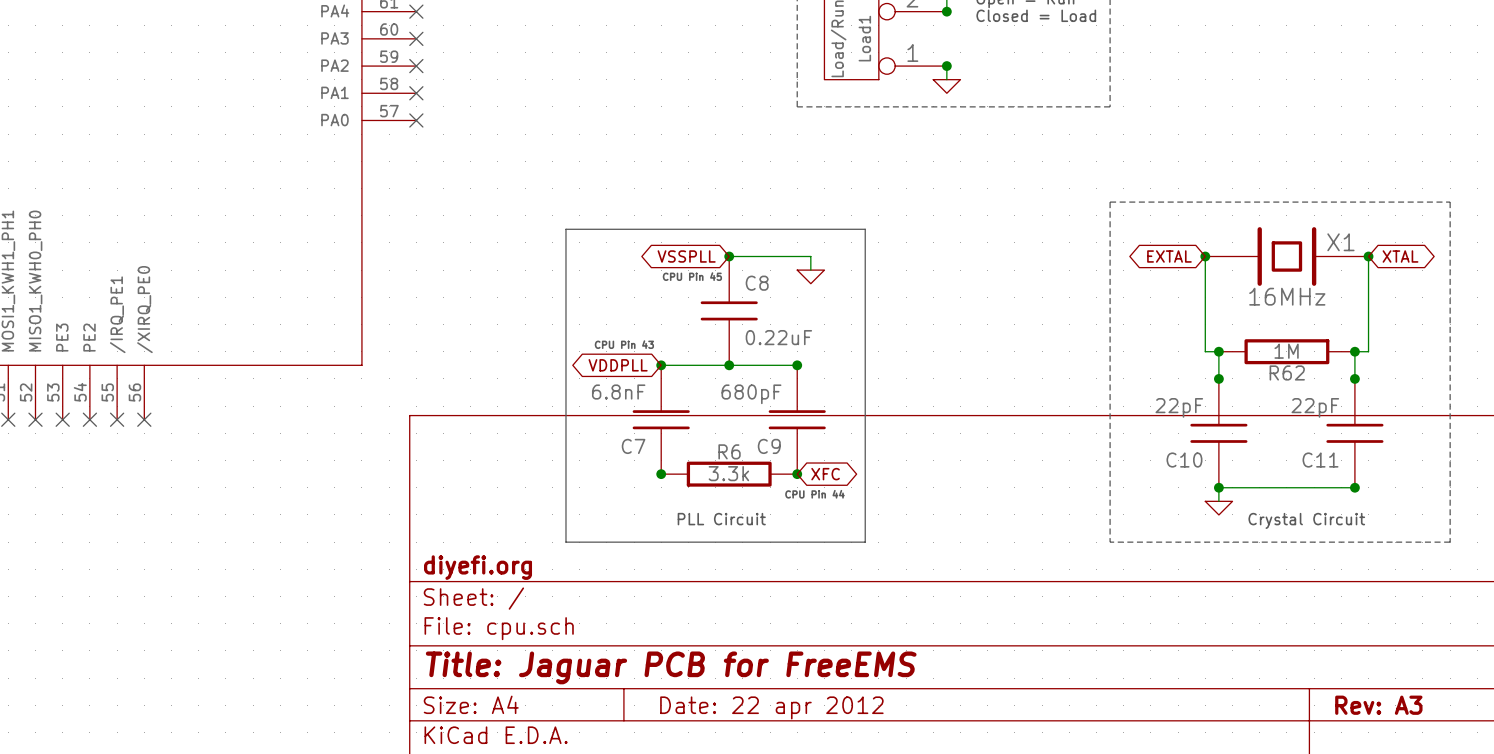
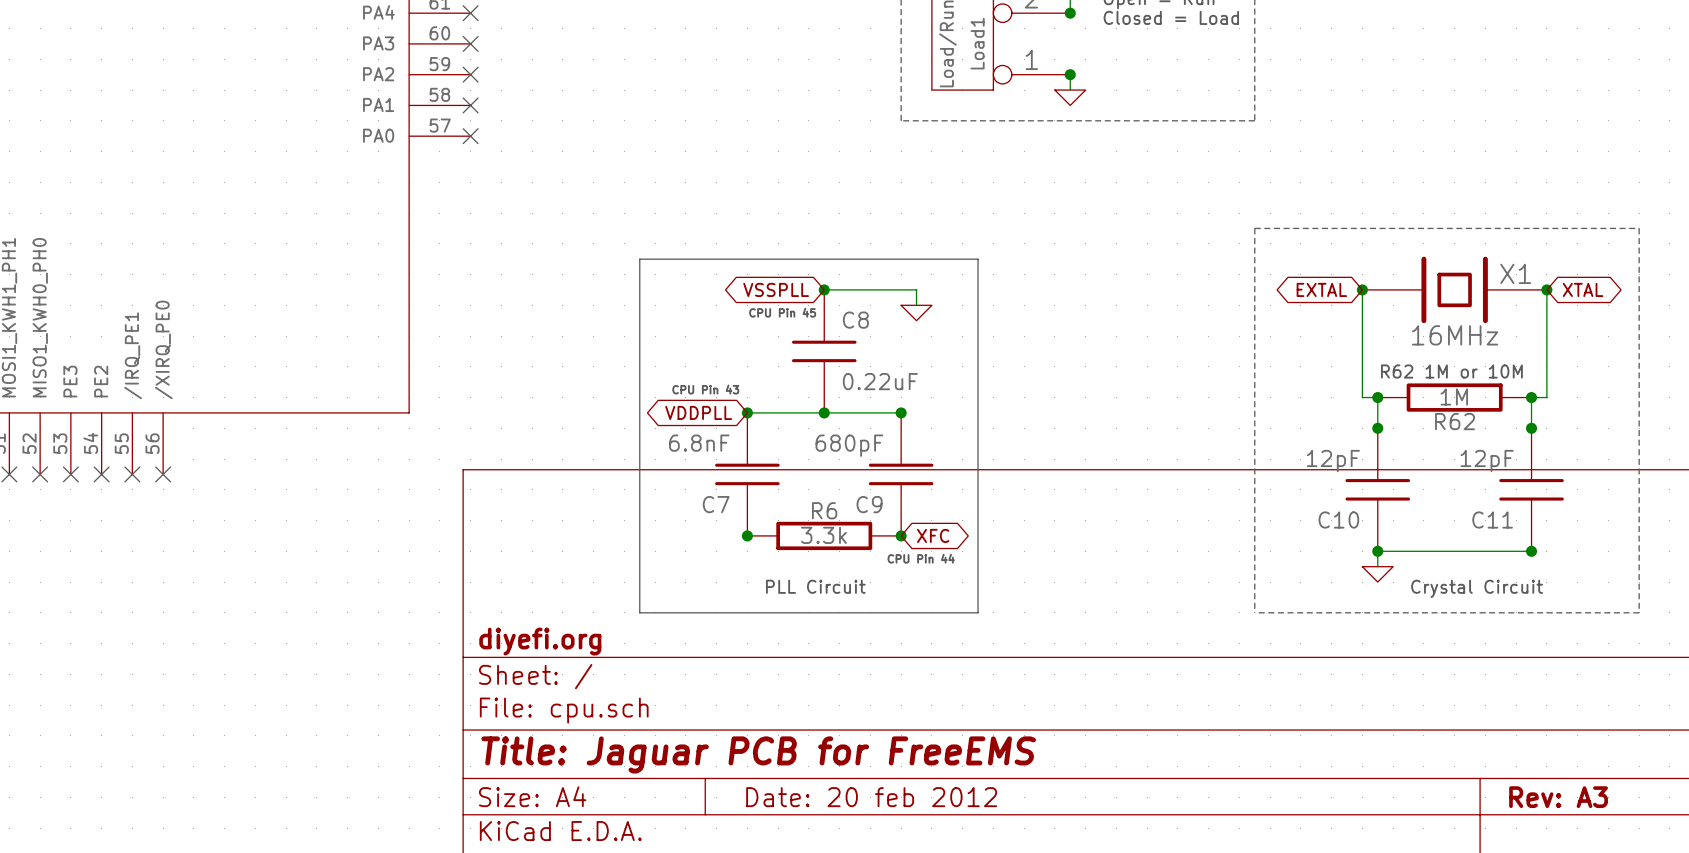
text: none -> R62 1M or 10M (1451, 371)
C10 value: 22pF (1179, 407) -> 12pF (1333, 461)
C11 value: 22pF (1315, 407) -> 12pF (1487, 461)
title block: Date: 22 apr 2012 (771, 707) -> Date: 20 feb 2012 (871, 797)

